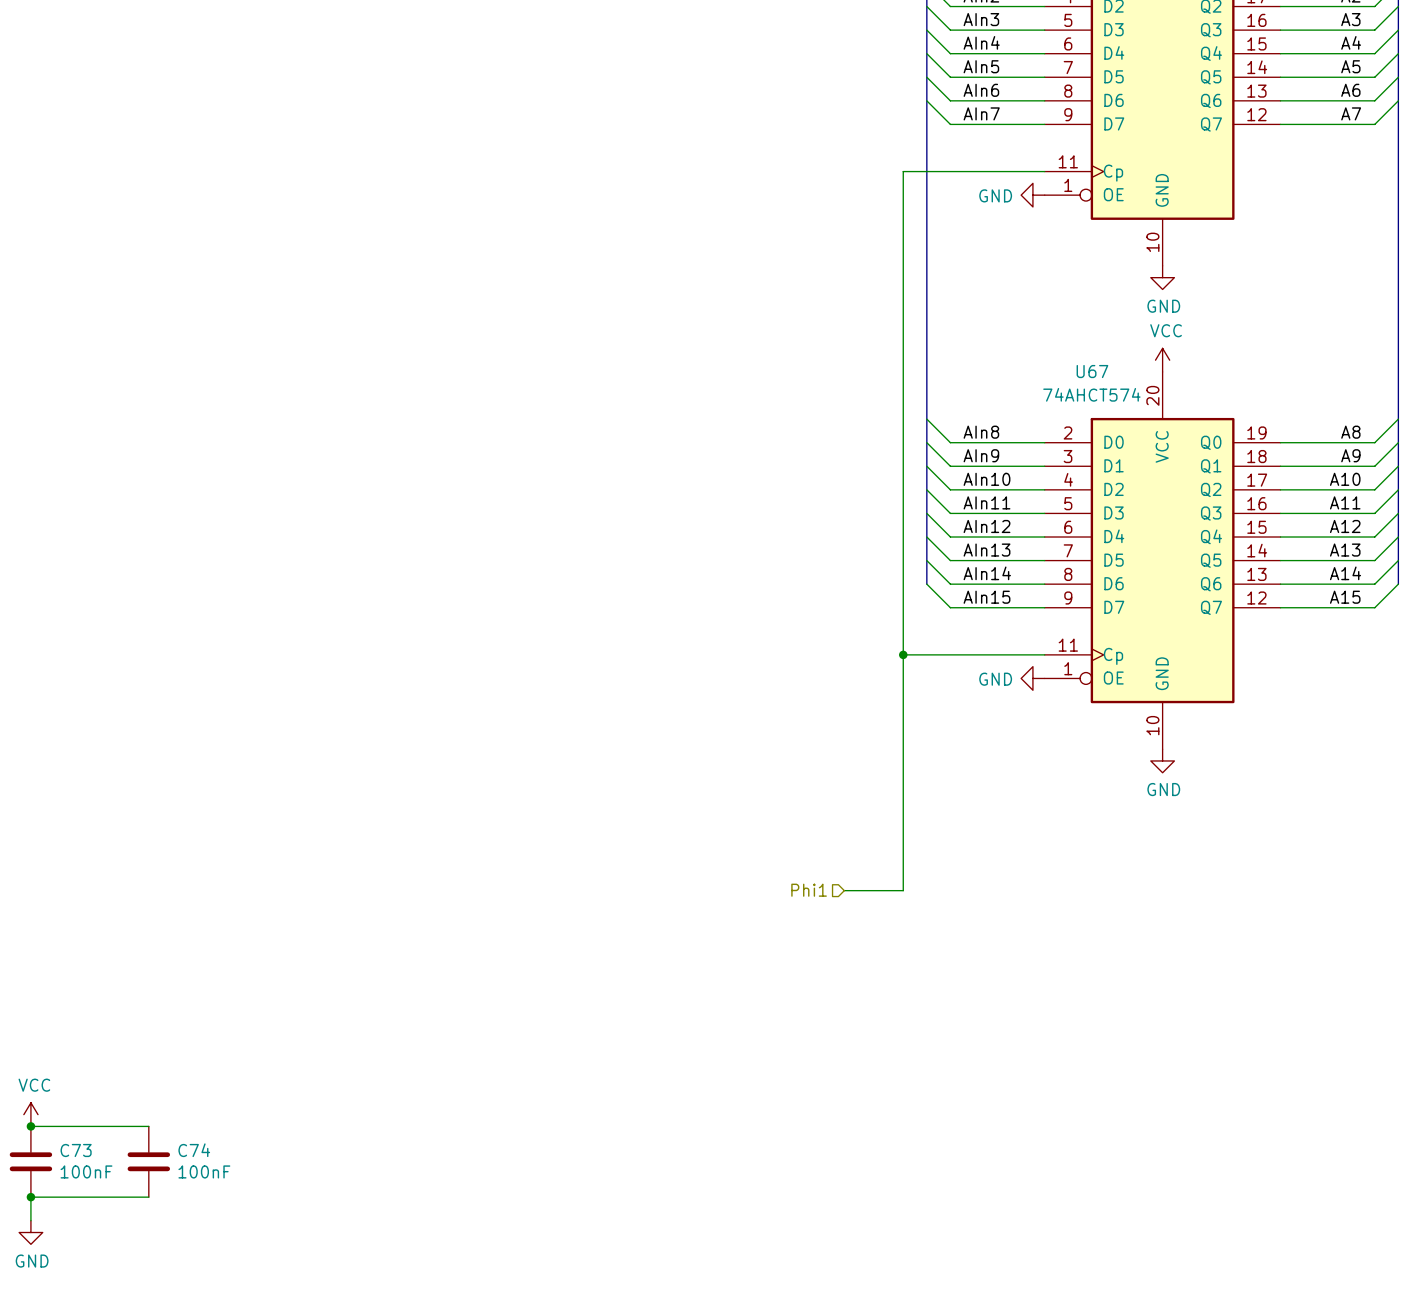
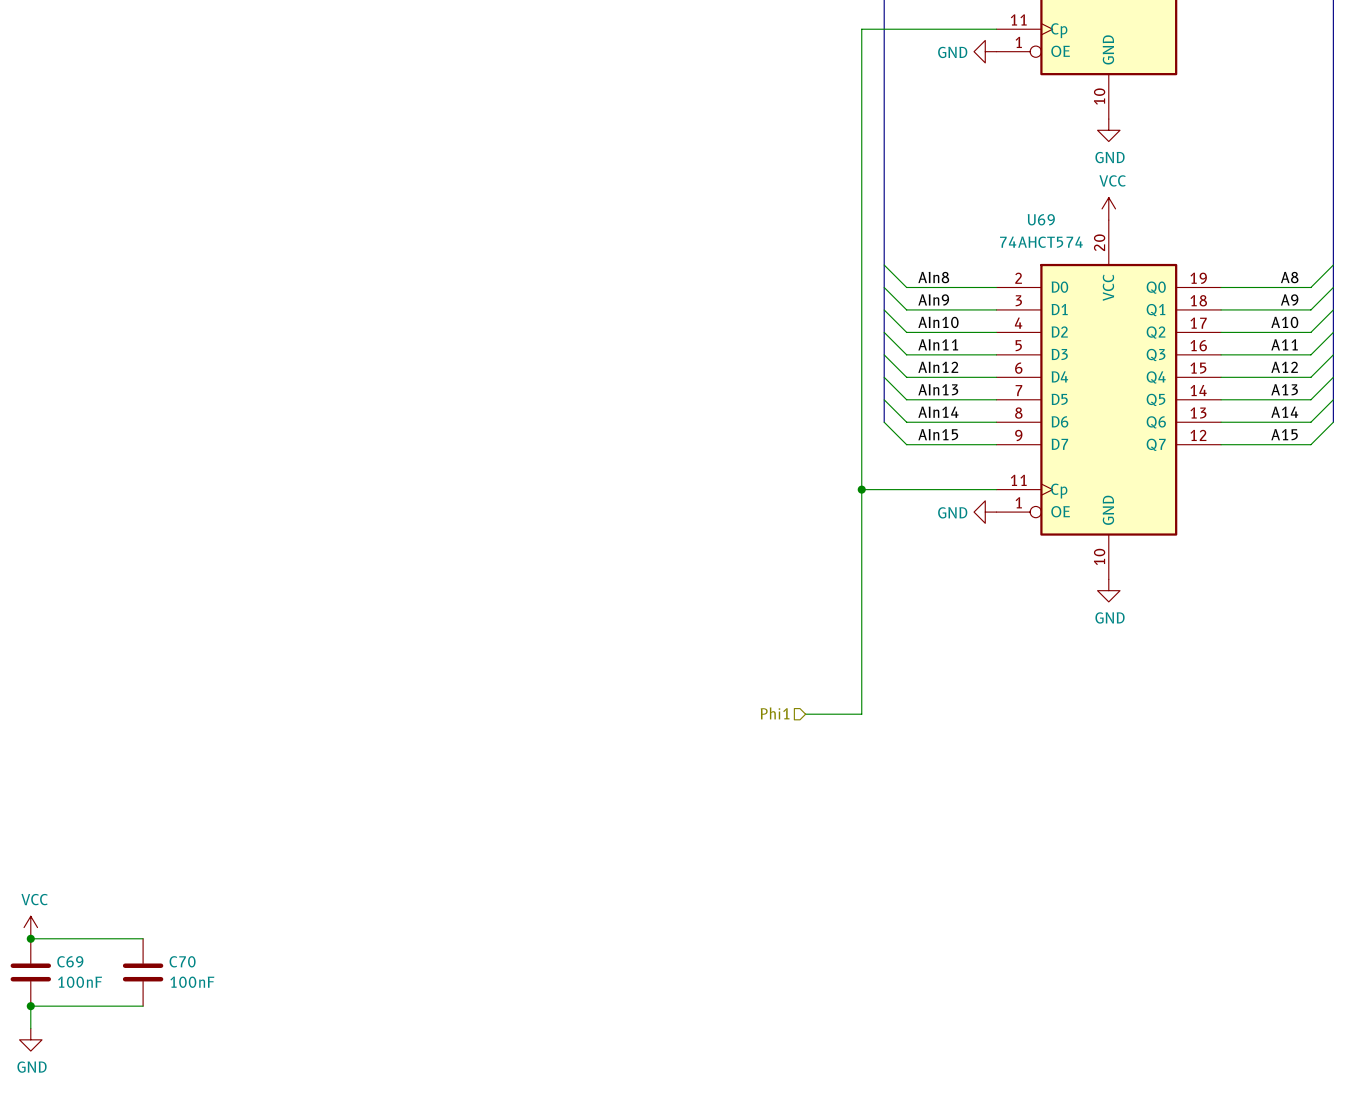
U67 name: U67 (1092, 371) -> U69 (1041, 219)
C73 name: C73 (76, 1150) -> C69 (70, 961)
C74 name: C74 (194, 1150) -> C70 (182, 961)

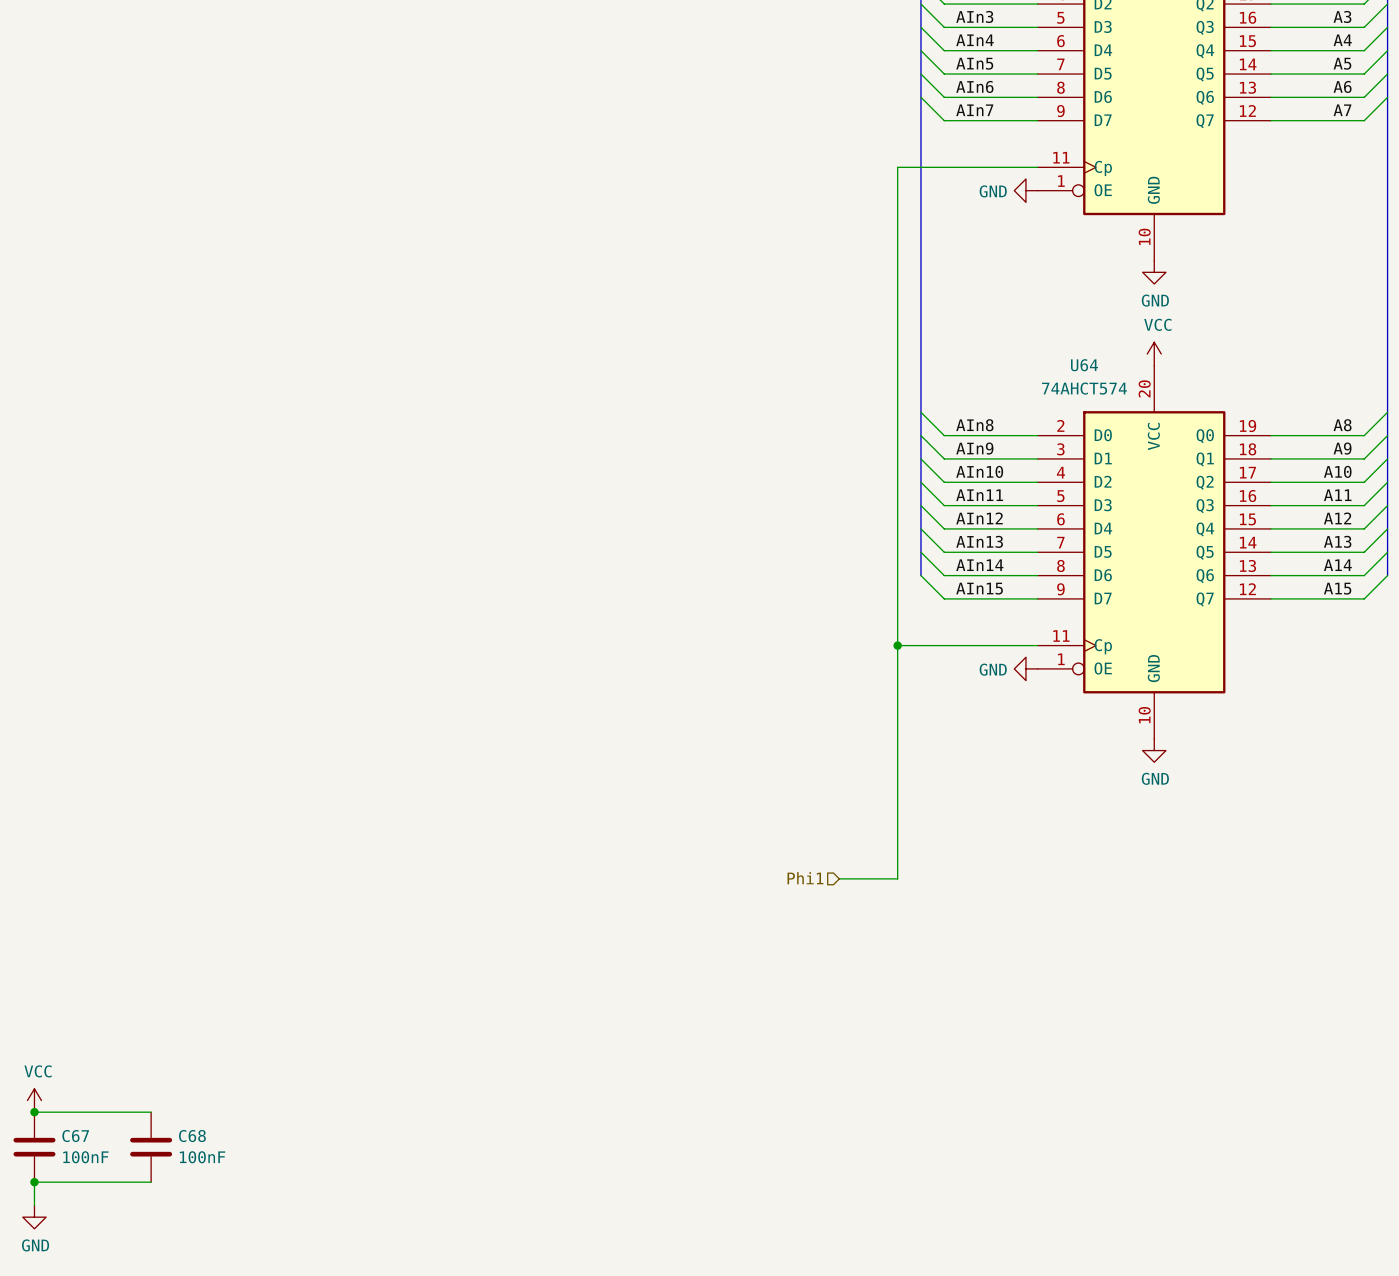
U69 name: U69 (1041, 219) -> U64 (1084, 365)
C69 name: C69 (70, 961) -> C67 (75, 1136)
C70 name: C70 (182, 961) -> C68 (192, 1136)

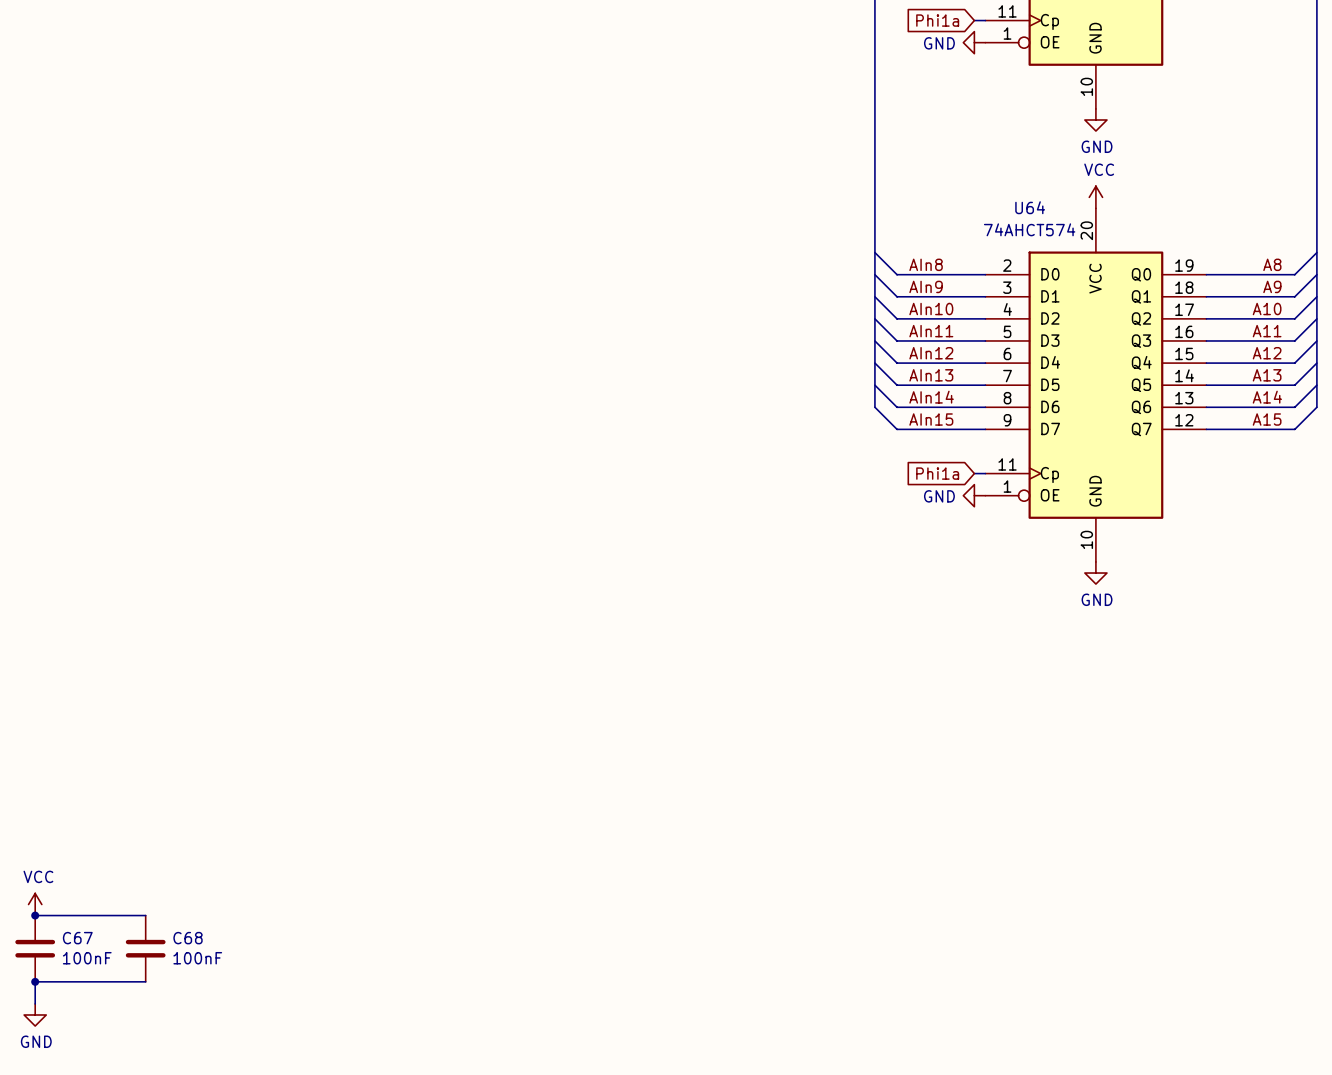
global label: none -> Phi1a (937, 20)
wire: (1025, 167) (897, 167) (897, 878) (839, 878) -> none
wire: (897, 645) (1025, 645) -> none
junction: (897, 645) -> none
global label: none -> Phi1a (937, 473)
hierarchical label: Phi1 (805, 878) -> none

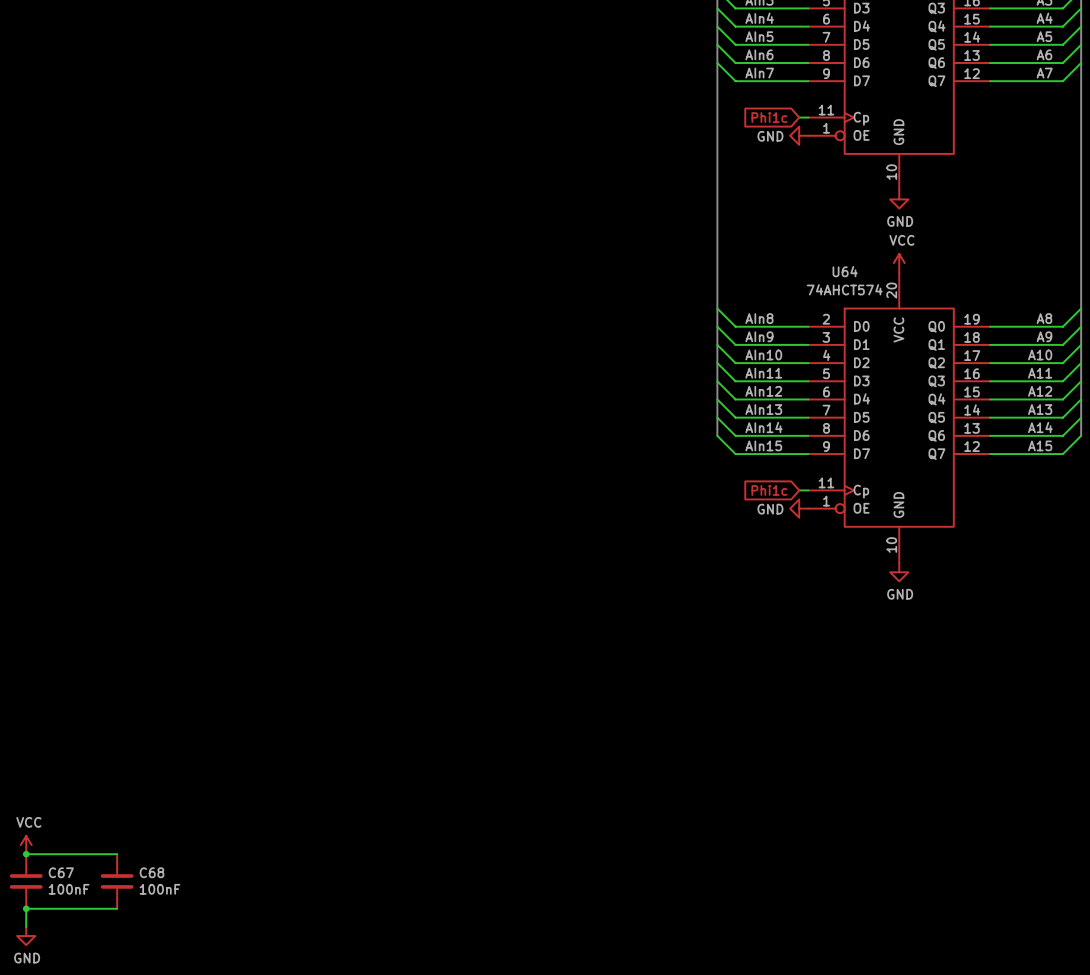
global label: Phi1a (937, 20) -> Phi1c (769, 117)
global label: Phi1a (937, 473) -> Phi1c (769, 490)

